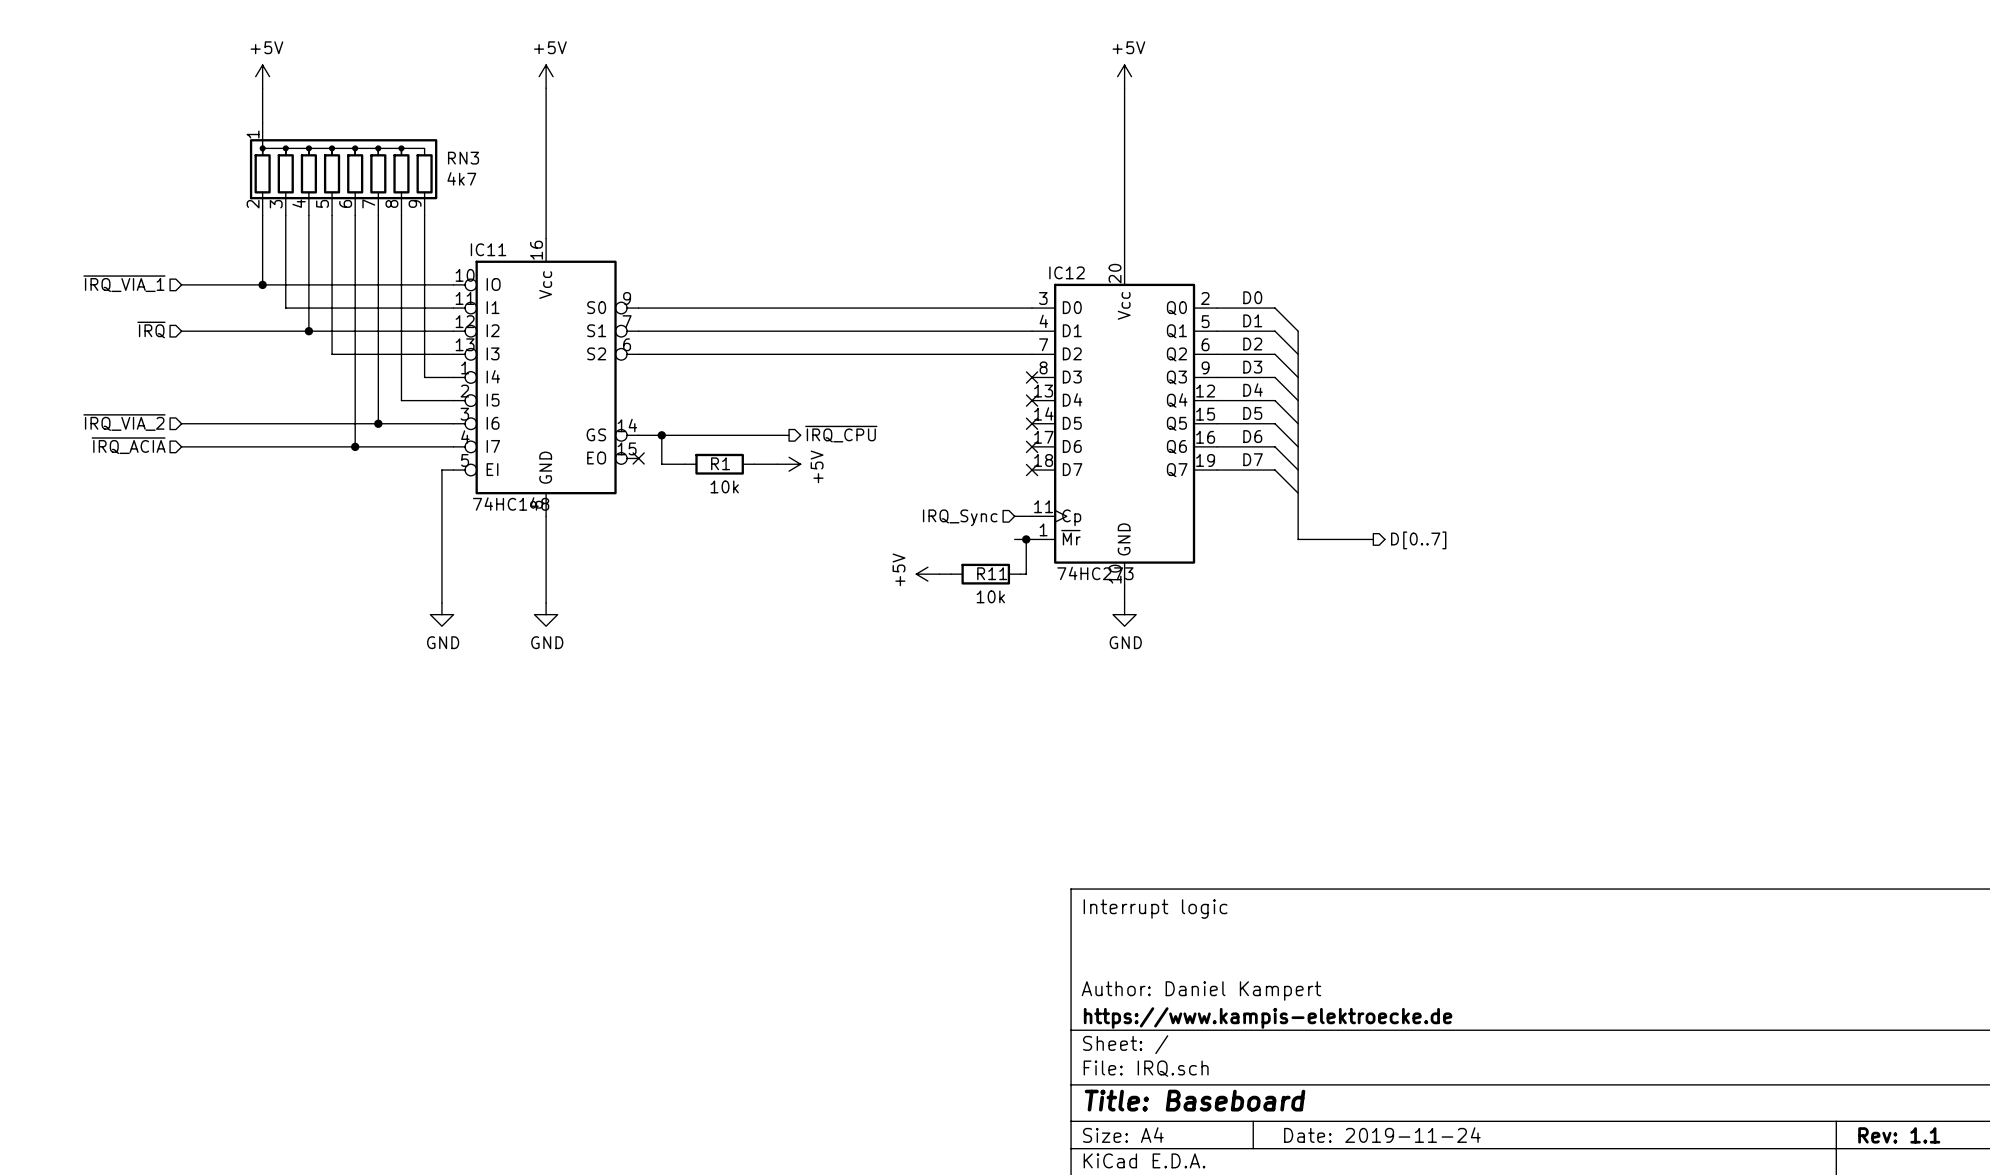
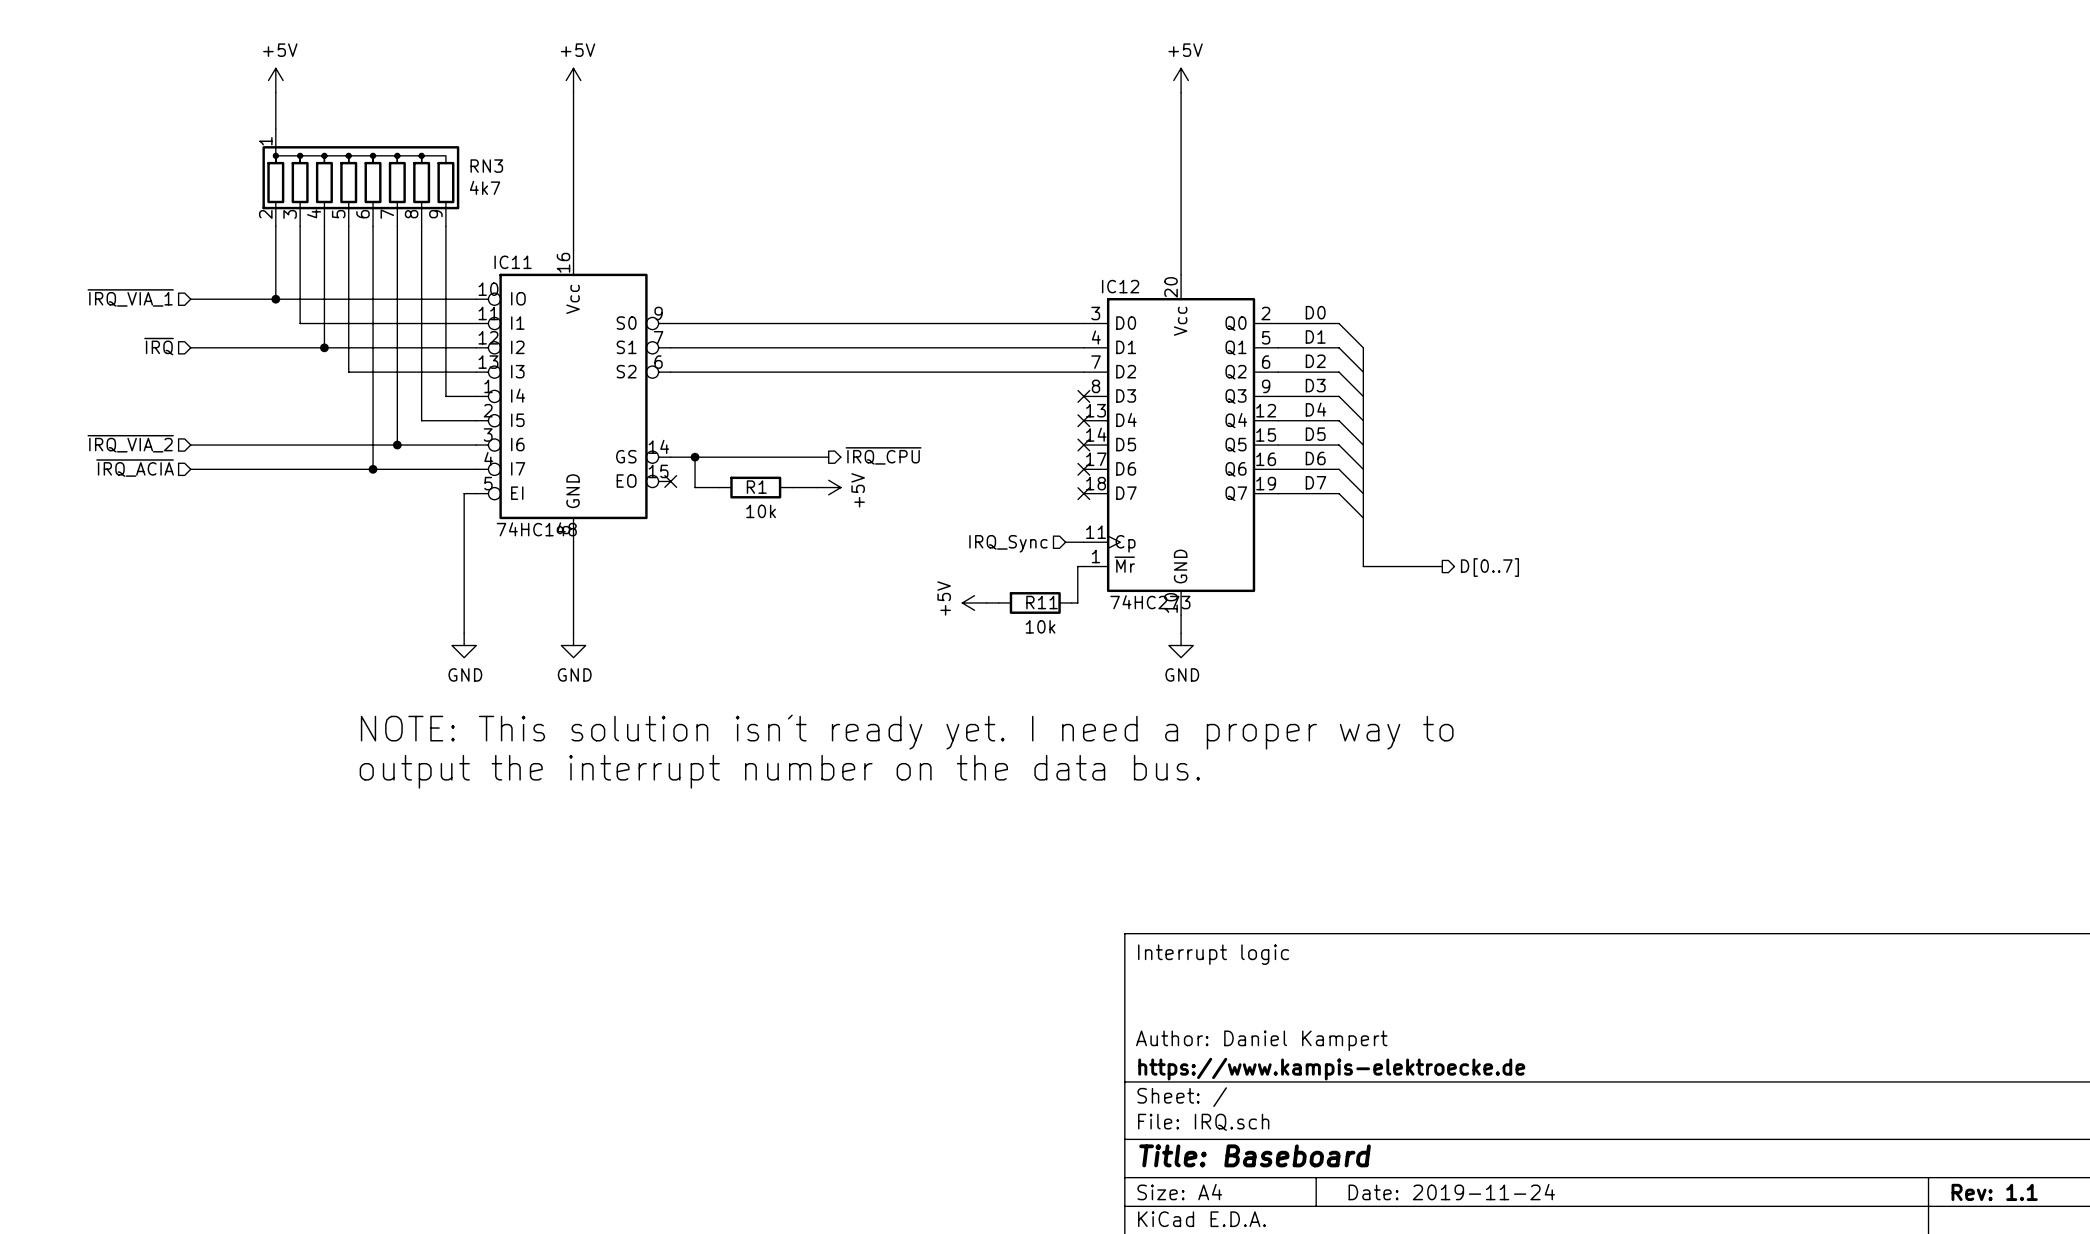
wire: (1014, 539) (1026, 539) -> none
junction: (1026, 539) -> none
text: none -> NOTE: This solution isn´t ready yet. I need a proper way to (907, 732)
text: none -> output the interrupt number on the data bus. (779, 771)

